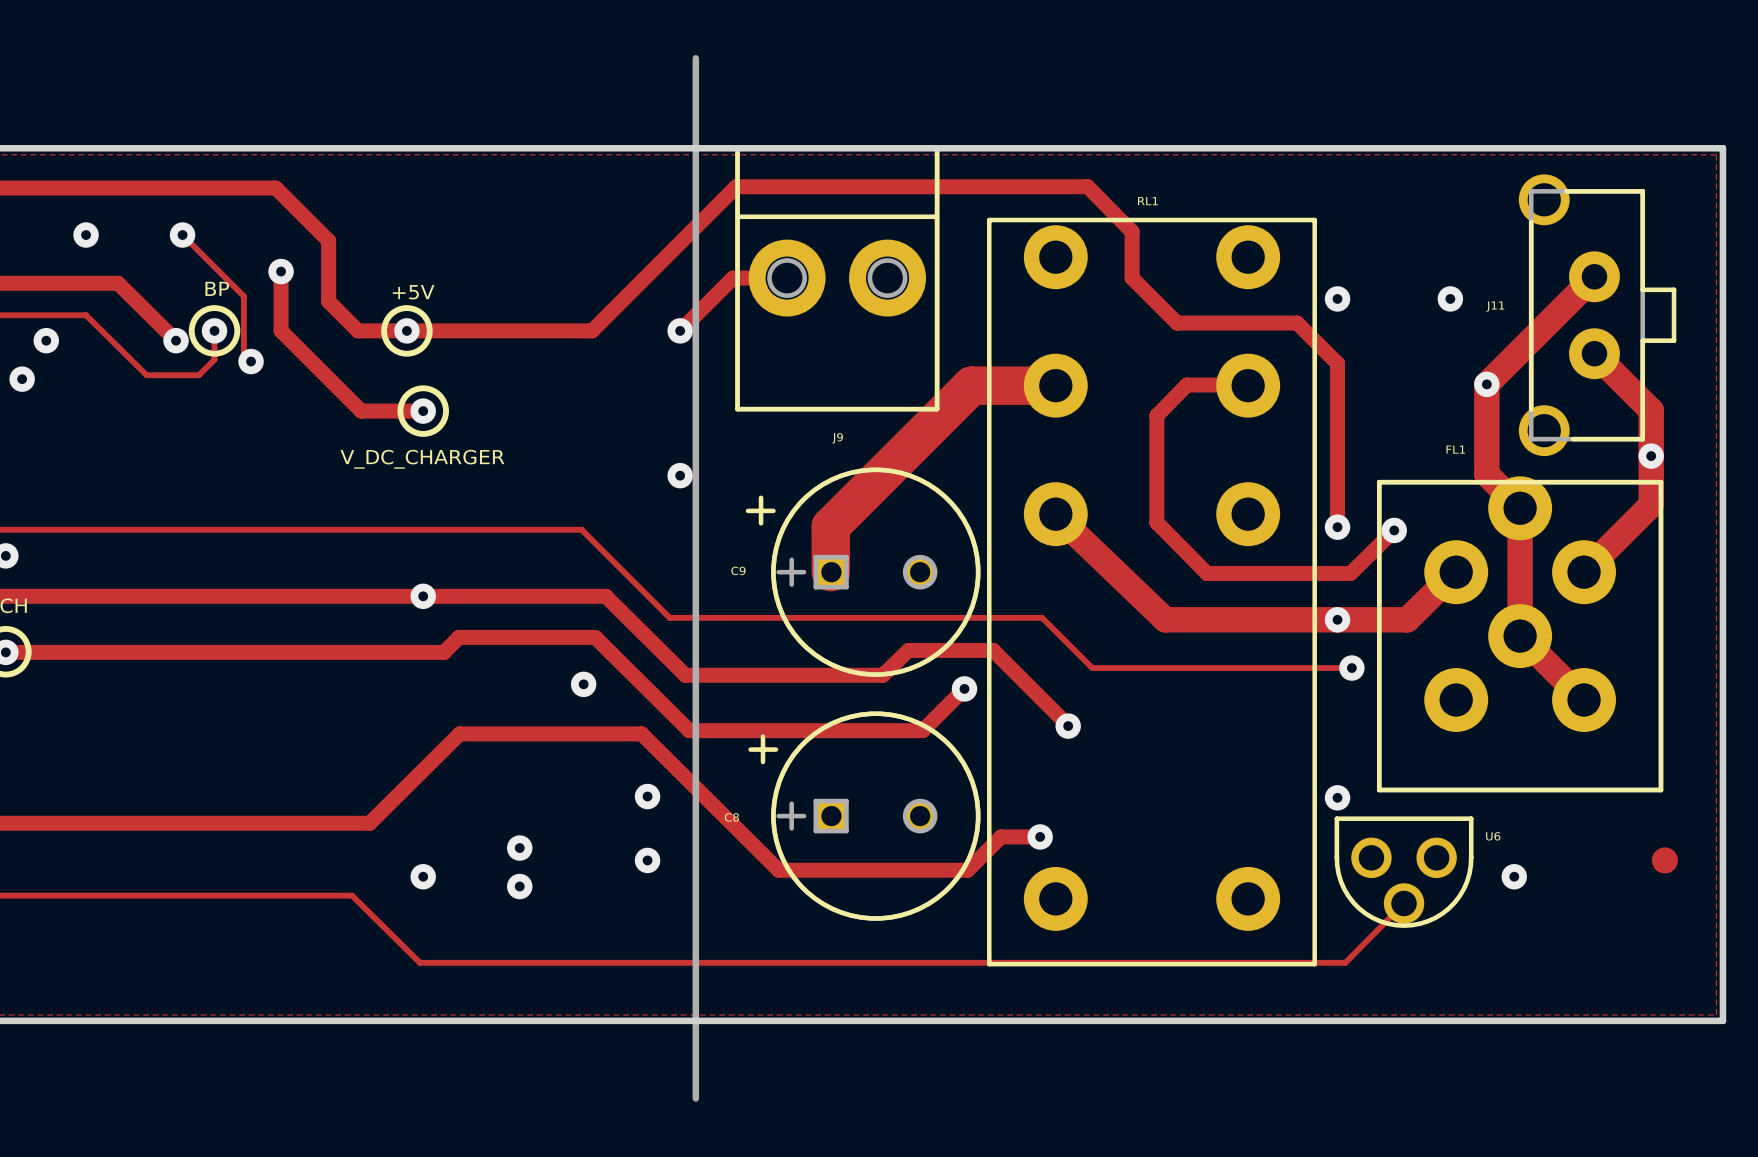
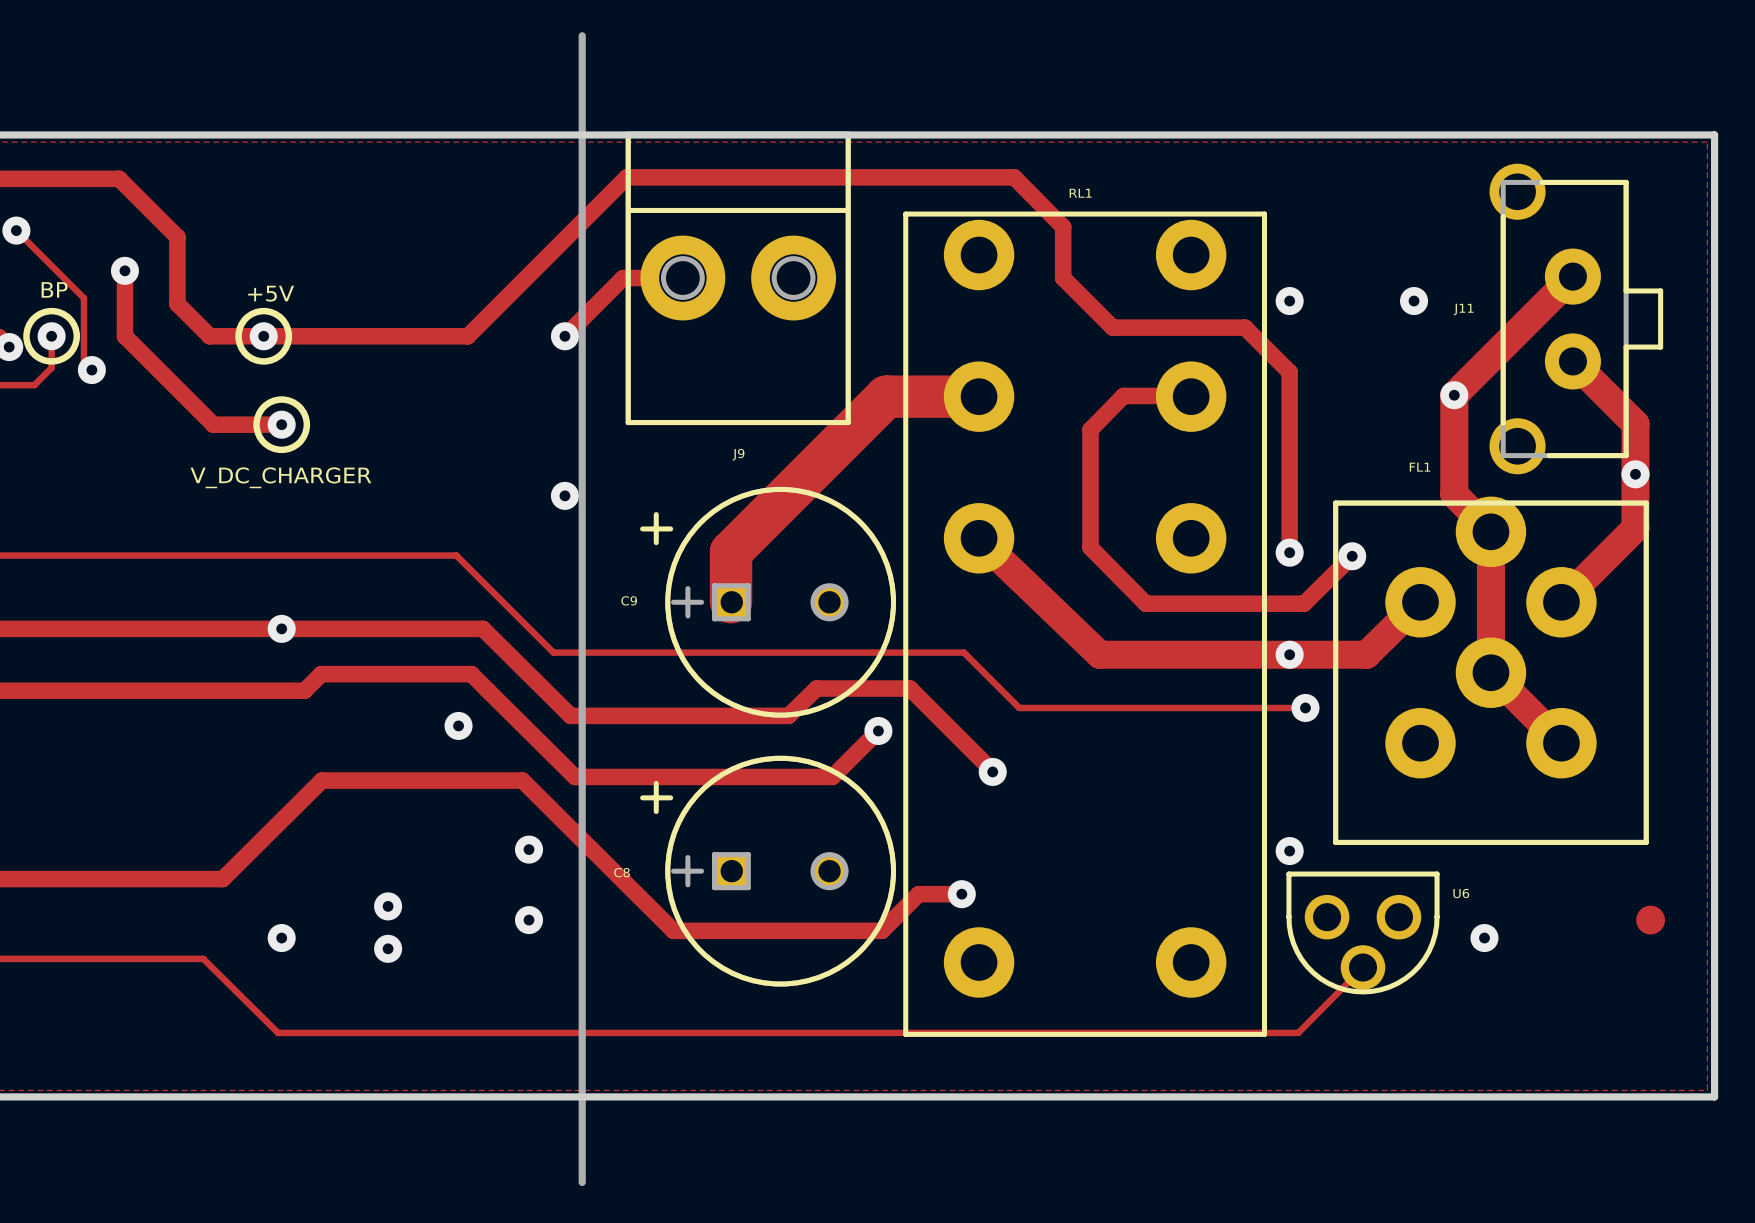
C9 footprint: [745, 467, 981, 677] -> [640, 486, 897, 718]

